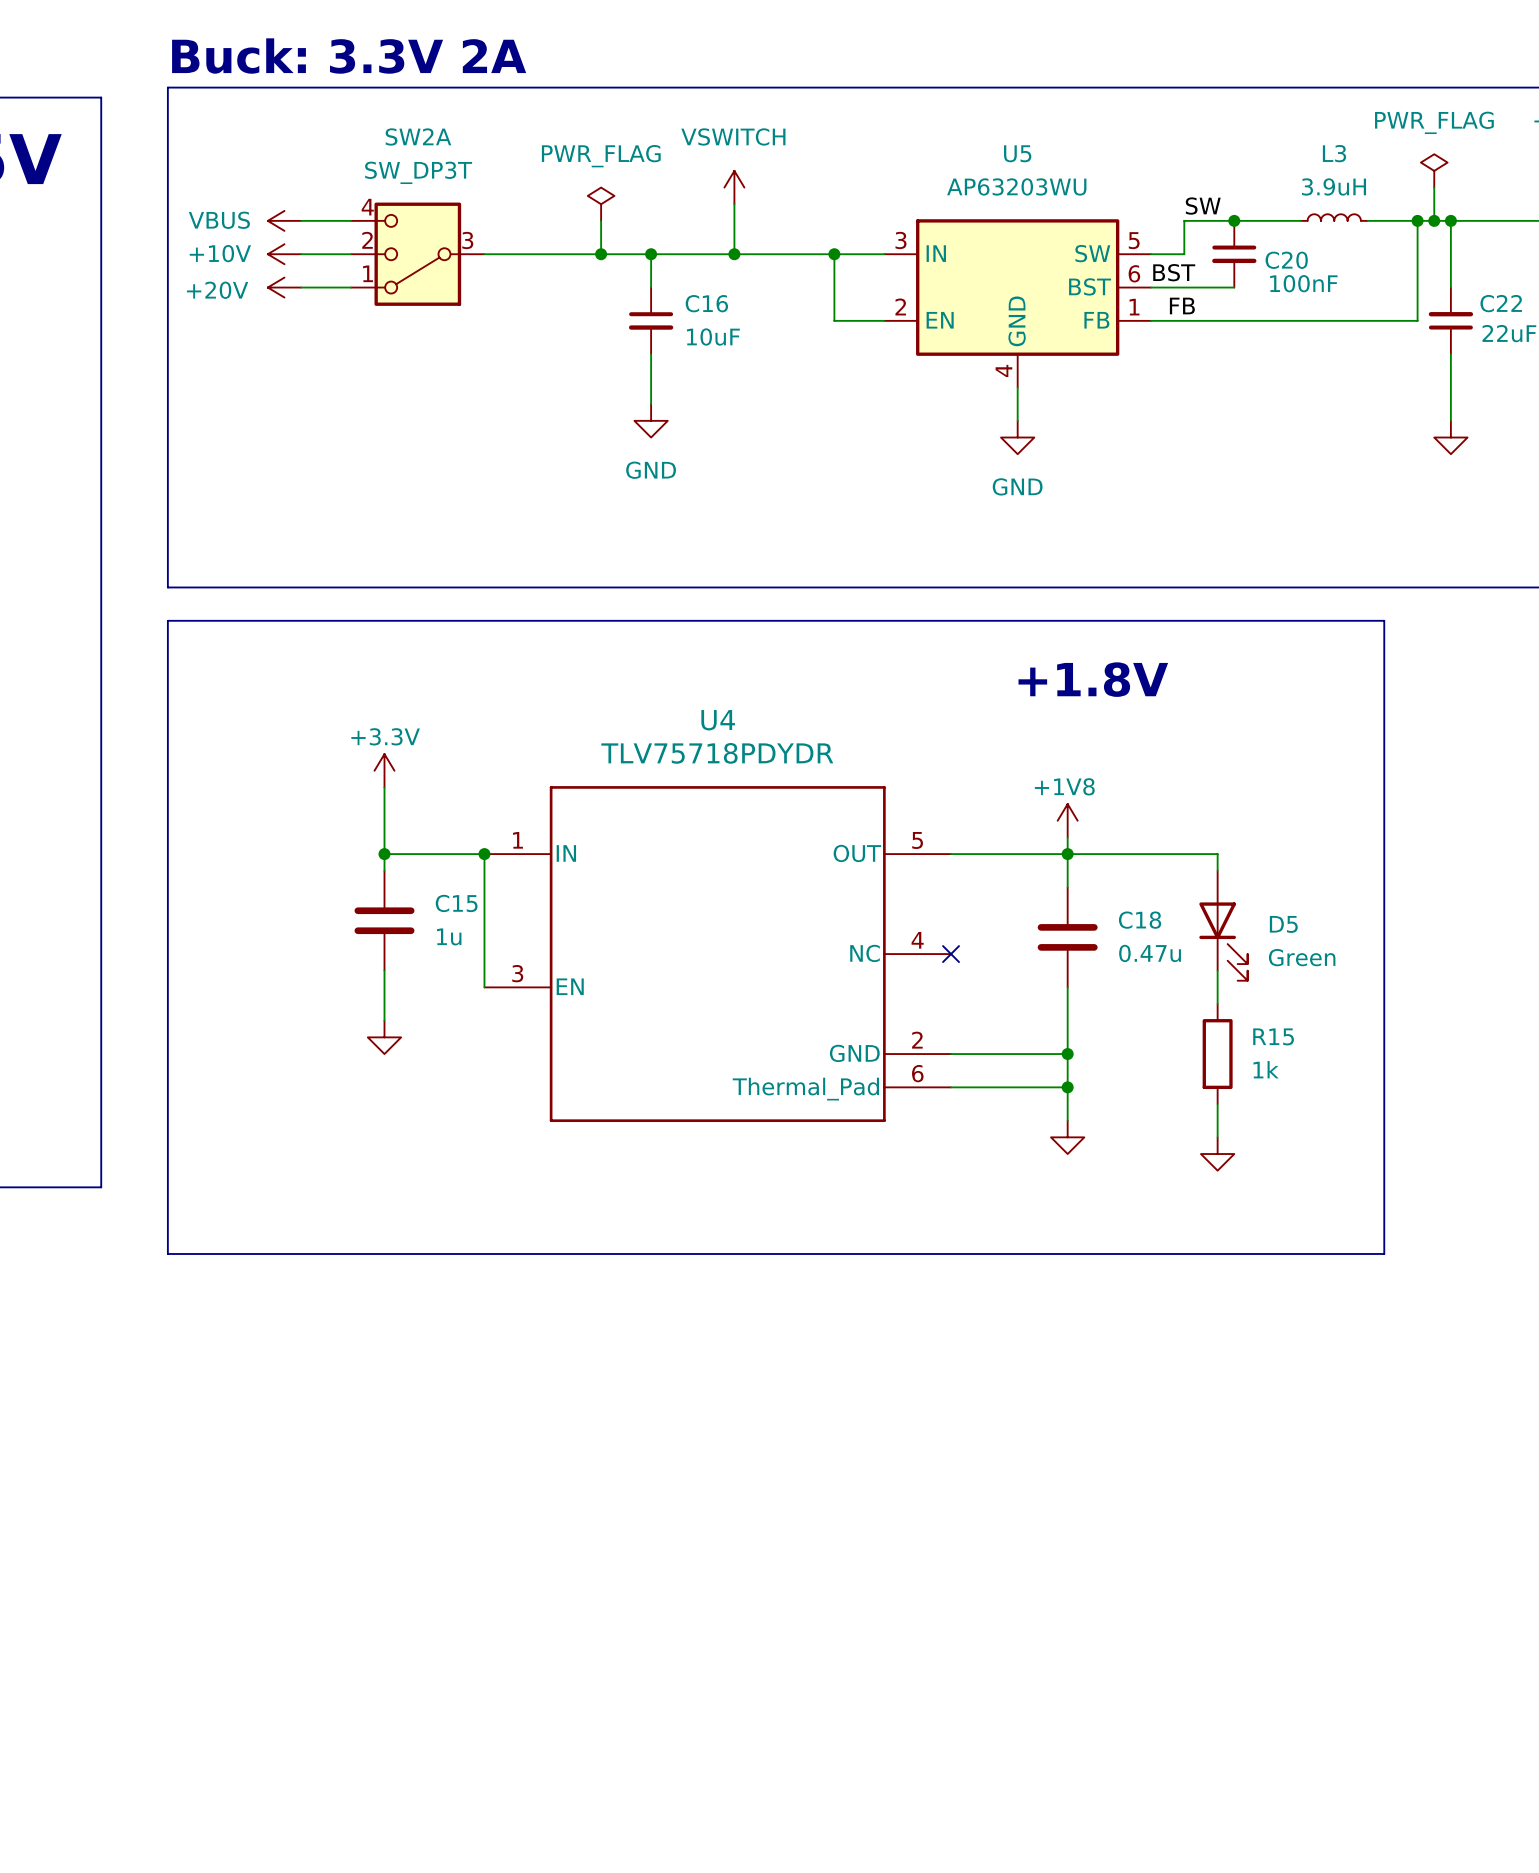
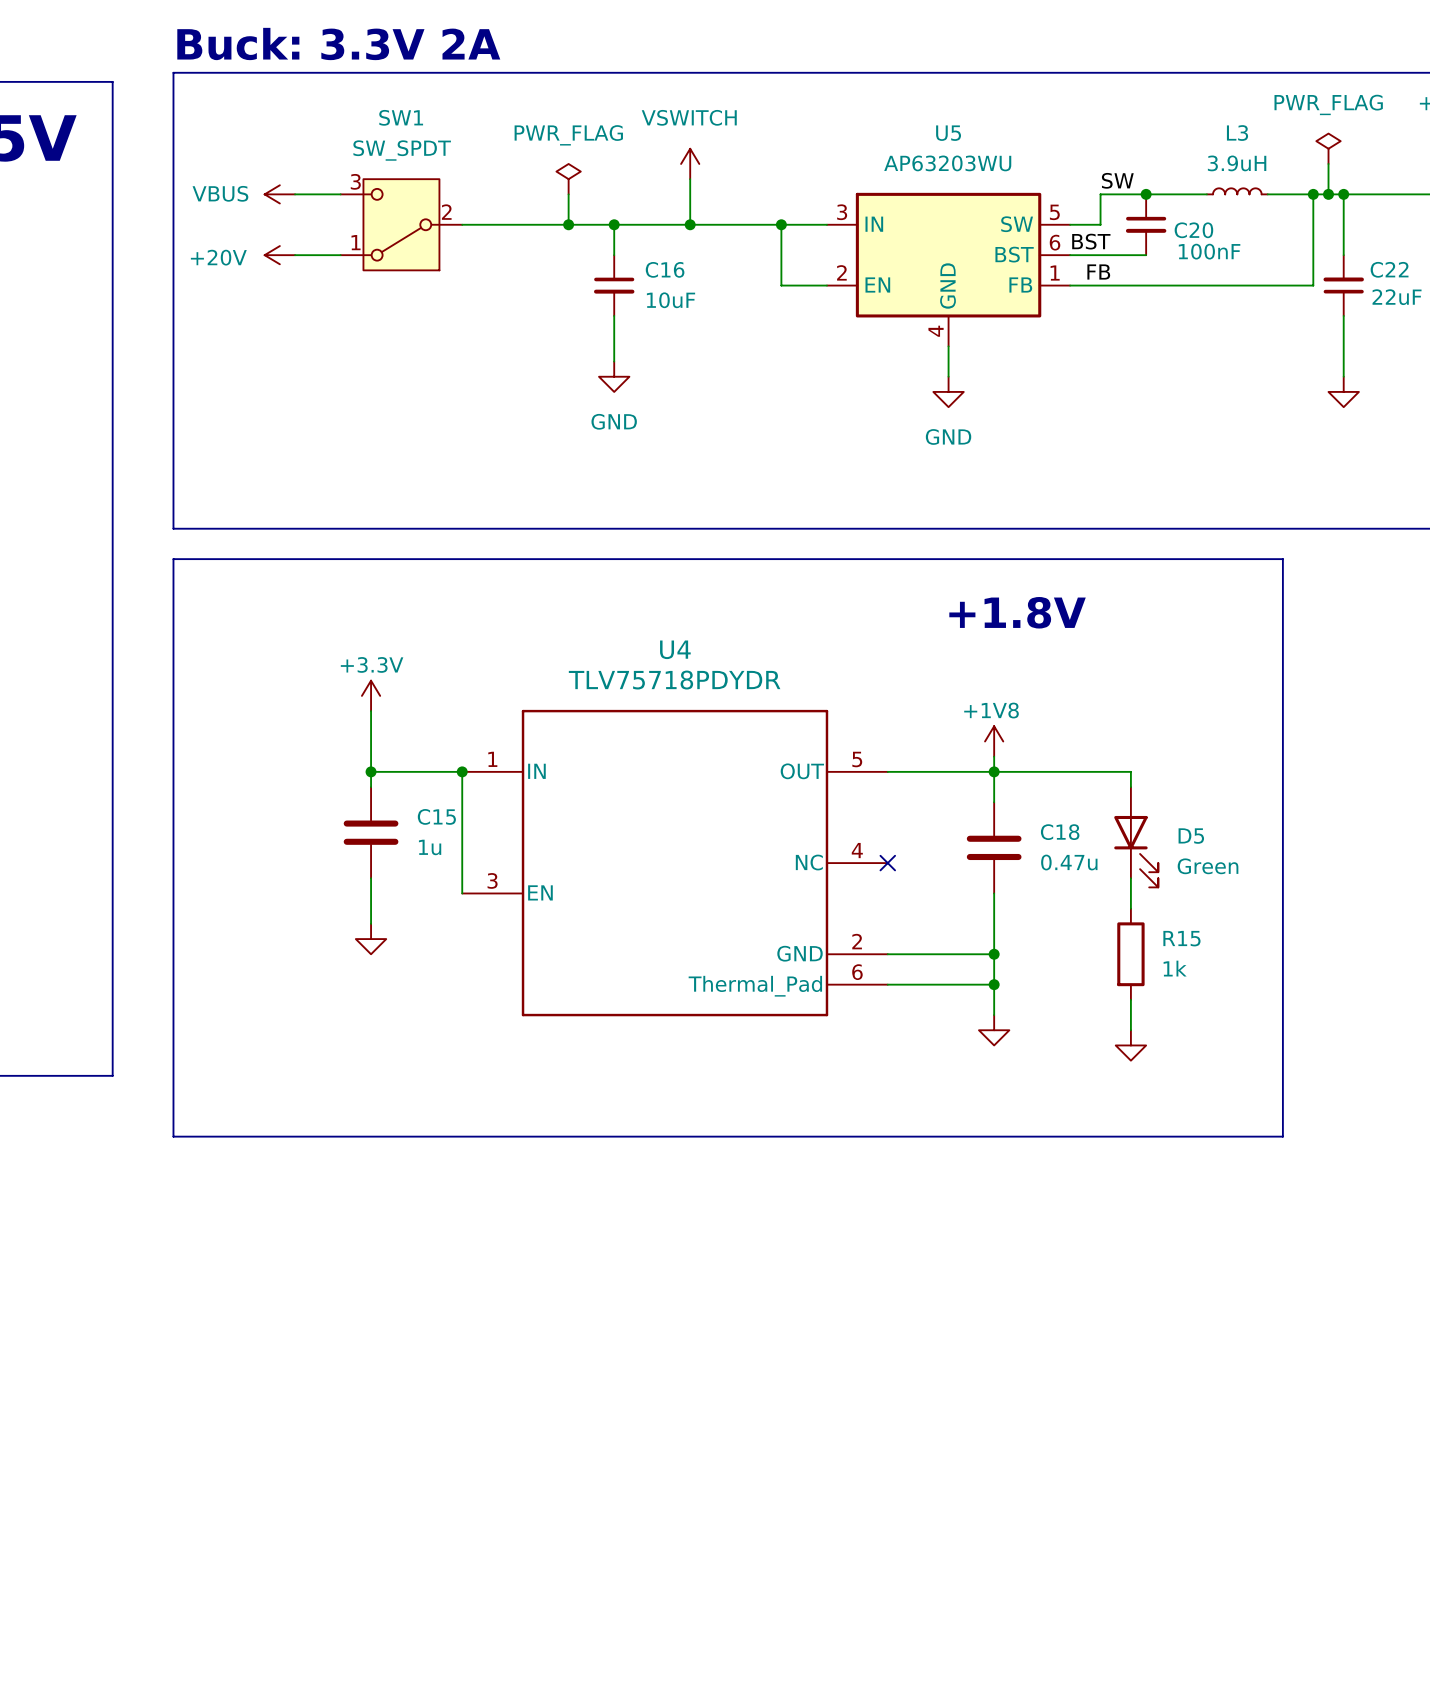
power symbol: +10V (284, 254) -> none
wire: (301, 254) (351, 254) -> none
SW2A: SW_DP3T (417, 254) -> none
SW1: none -> SW_SPDT (401, 224)

